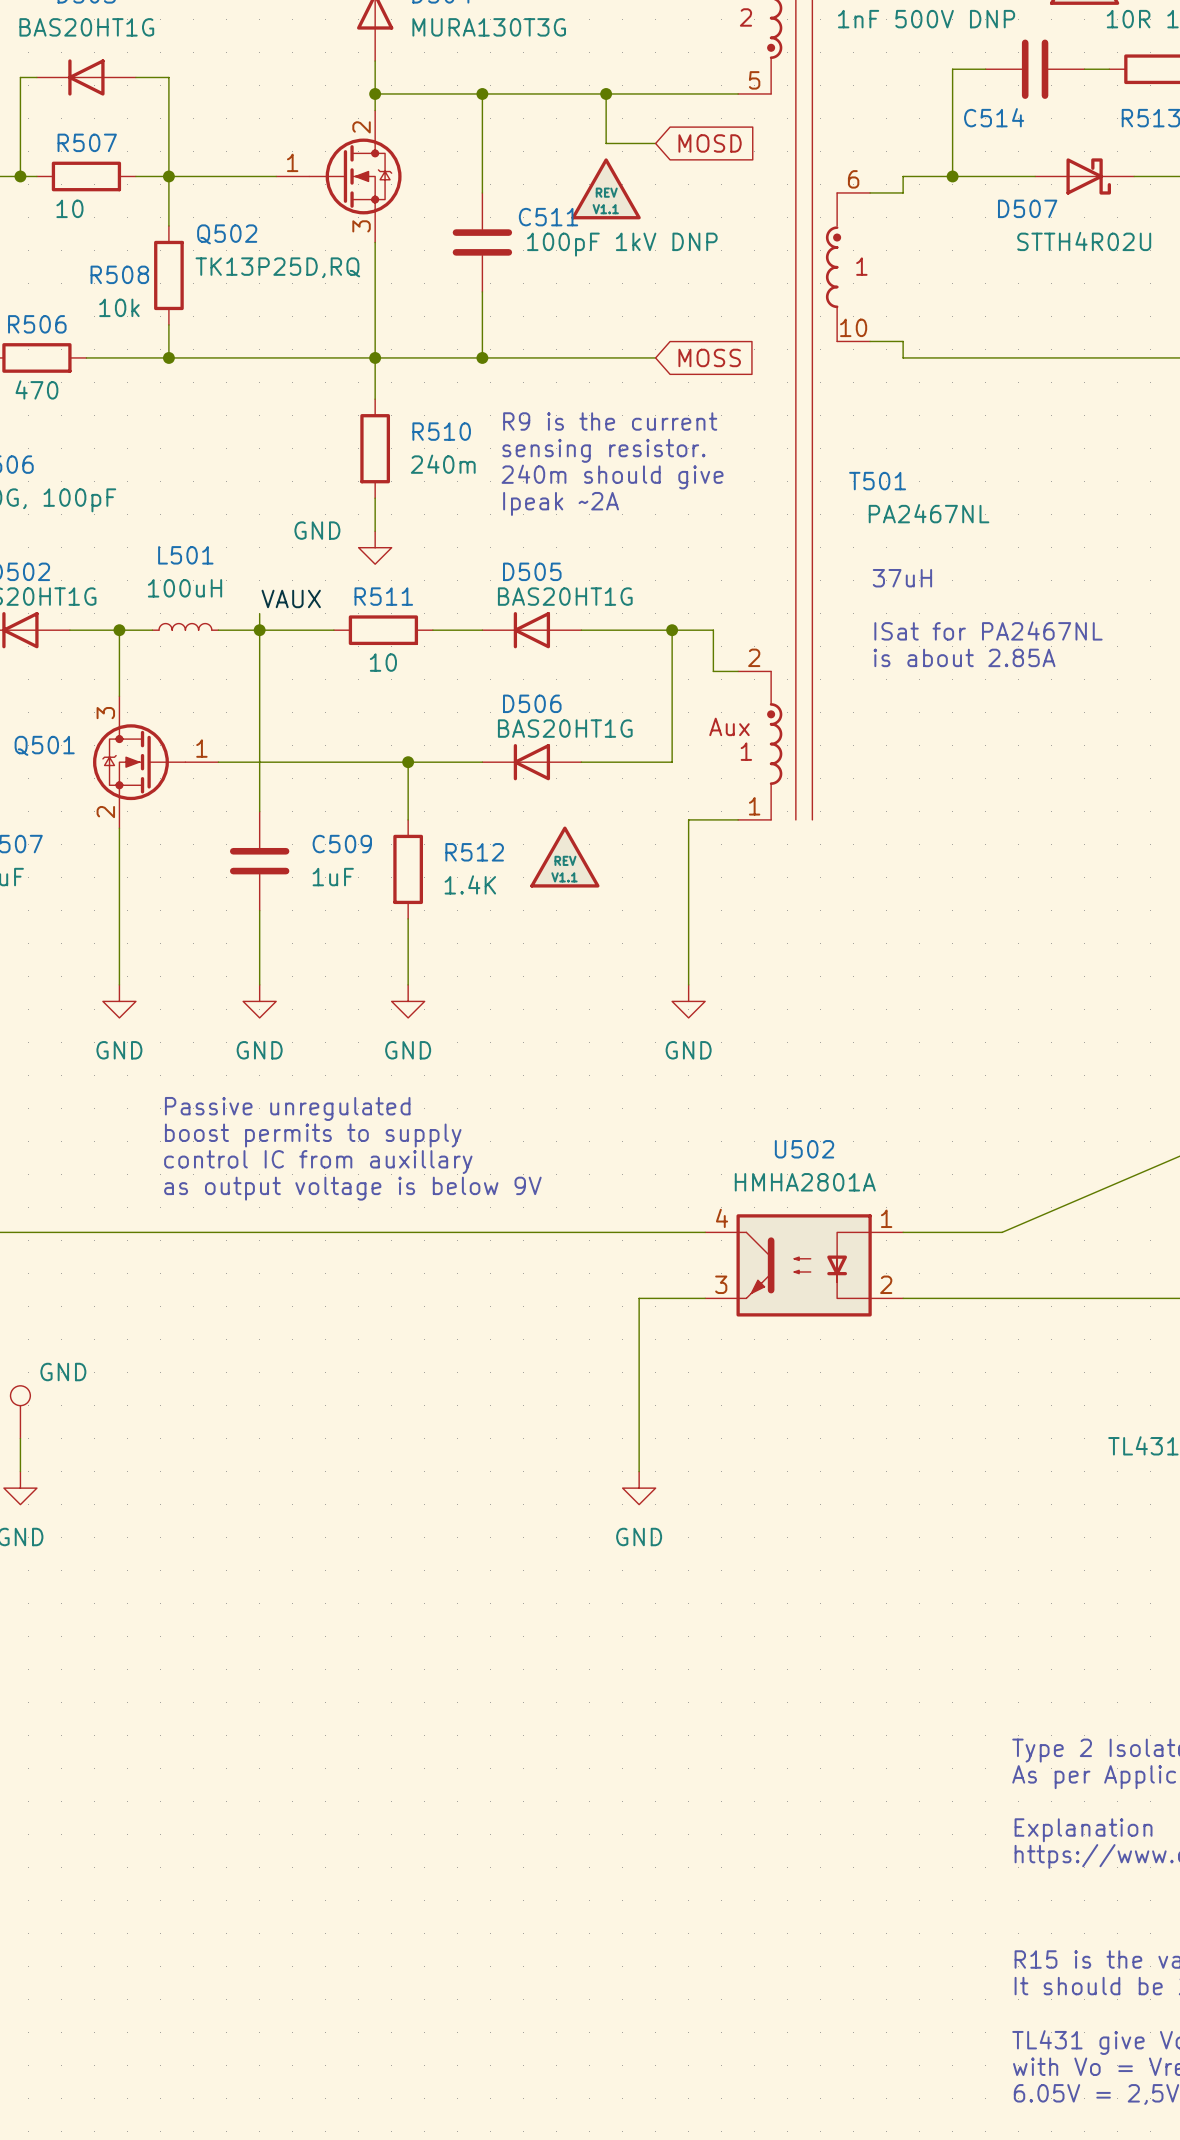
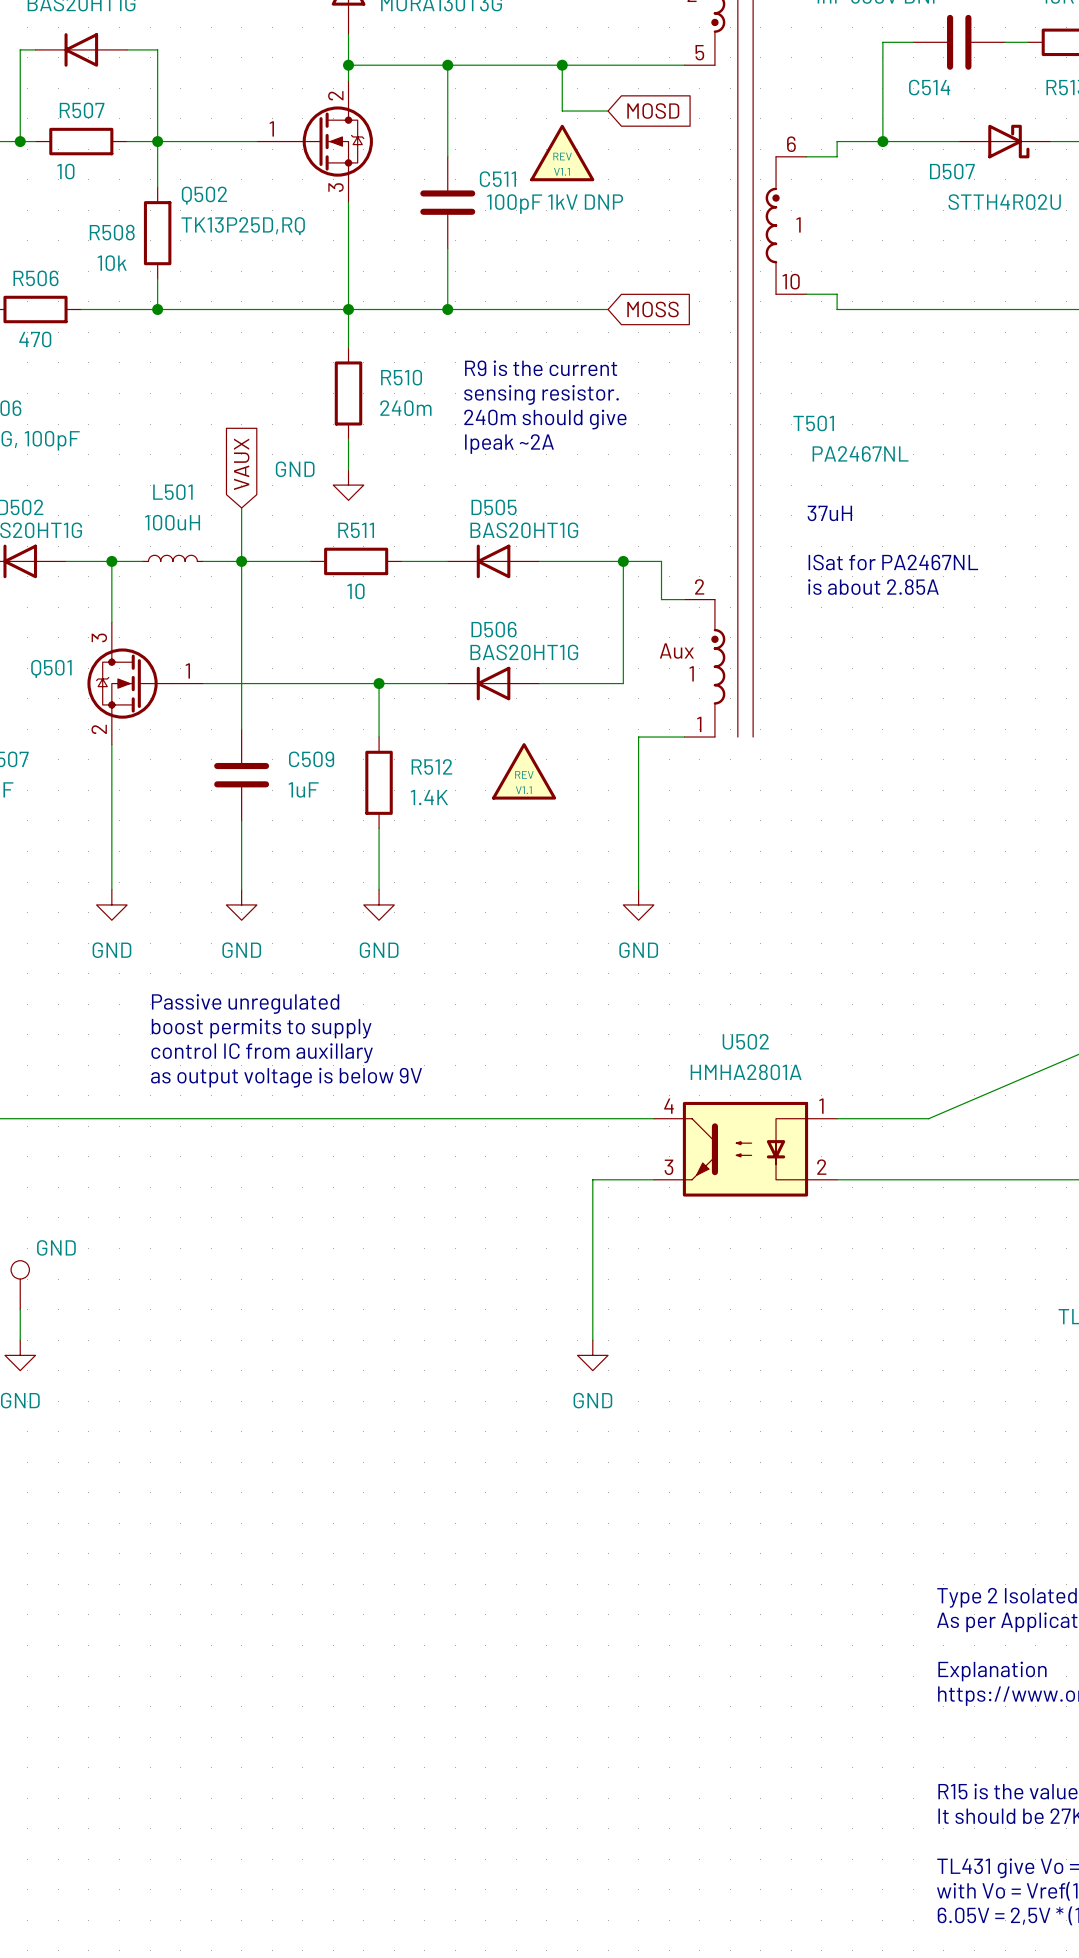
global label: none -> VAUX (241, 464)
wire: none -> (241, 507) (241, 546)
label: VAUX (291, 598) -> none

